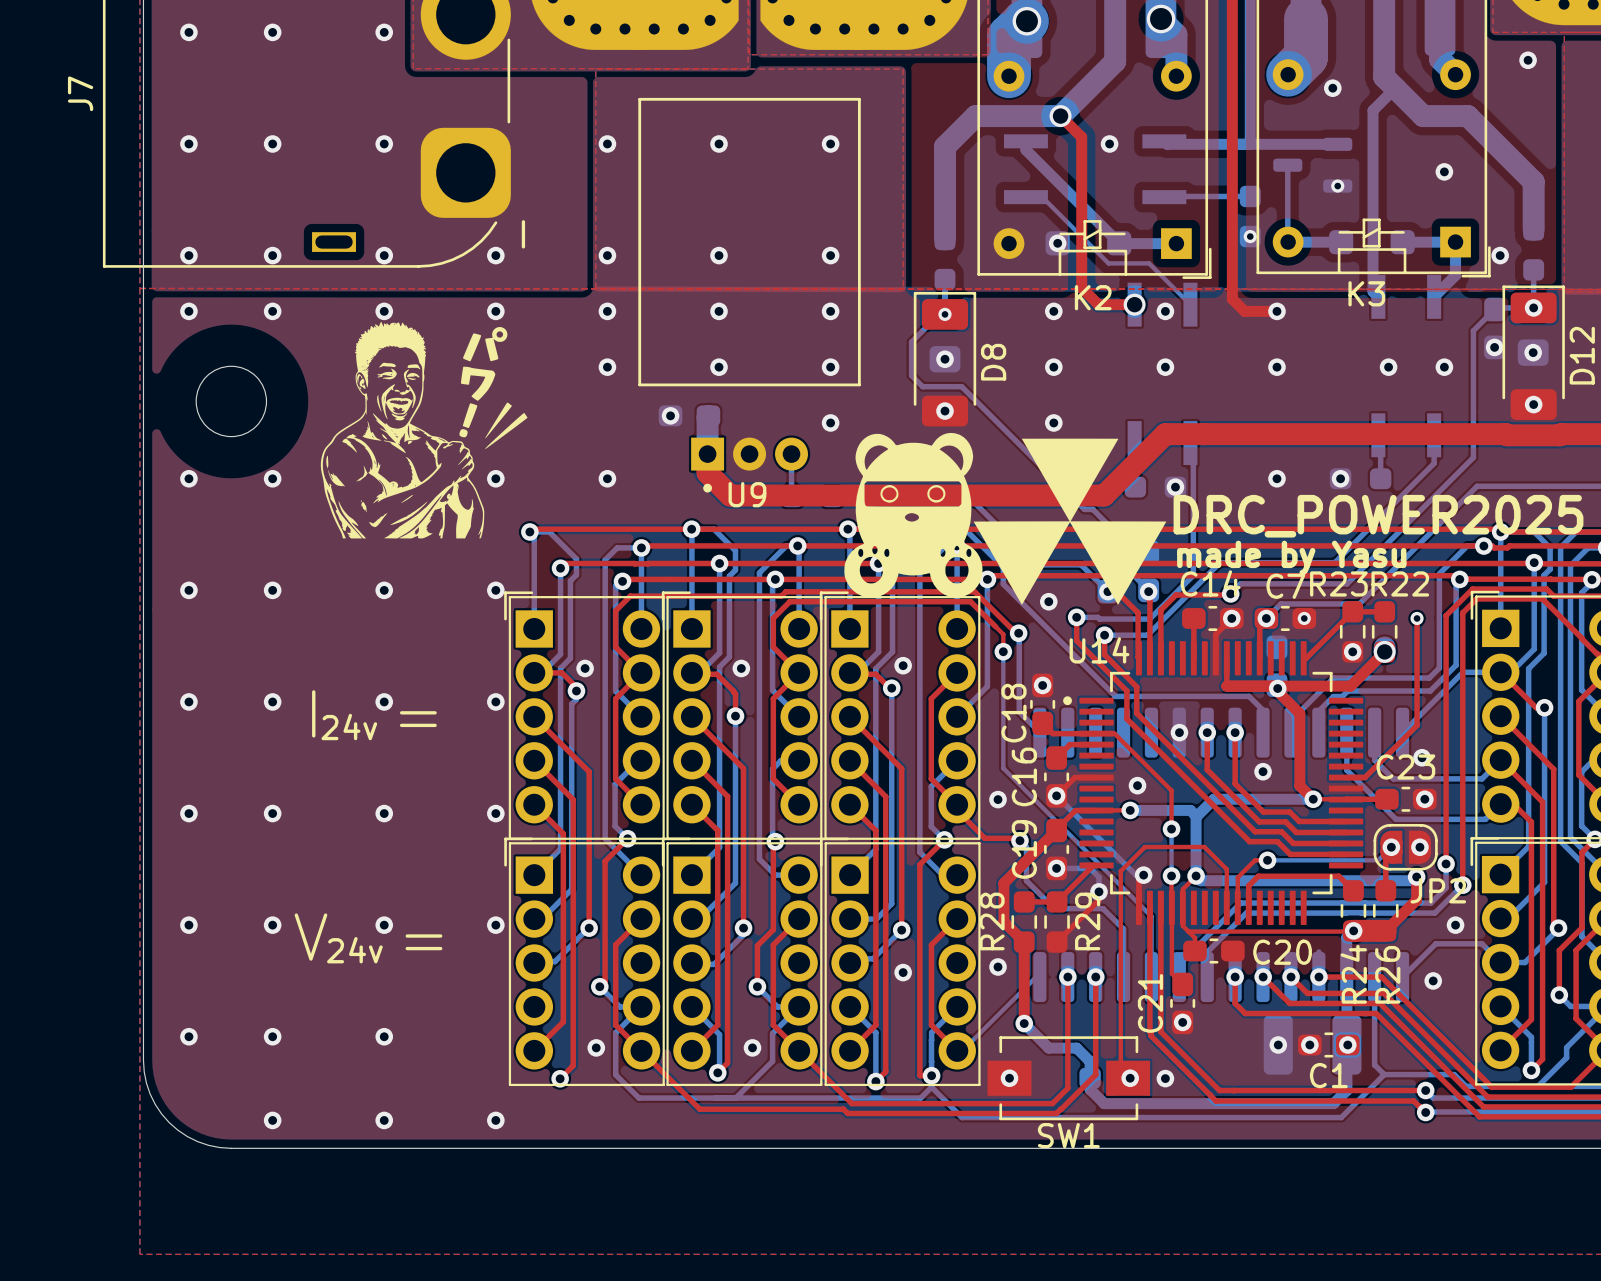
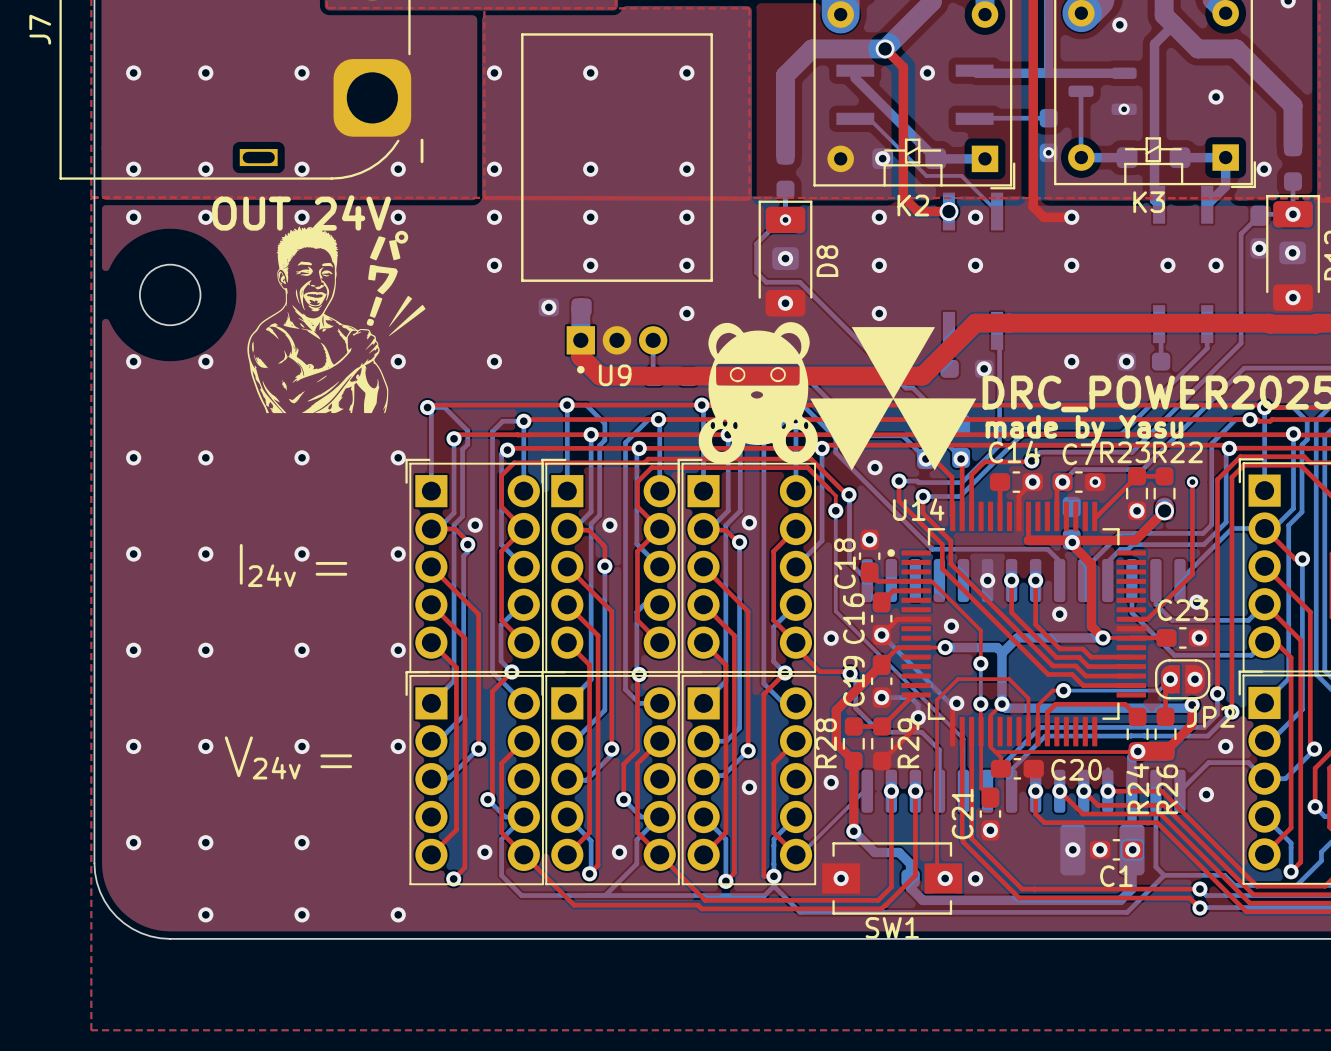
text: none -> OUT 24V (301, 212)

